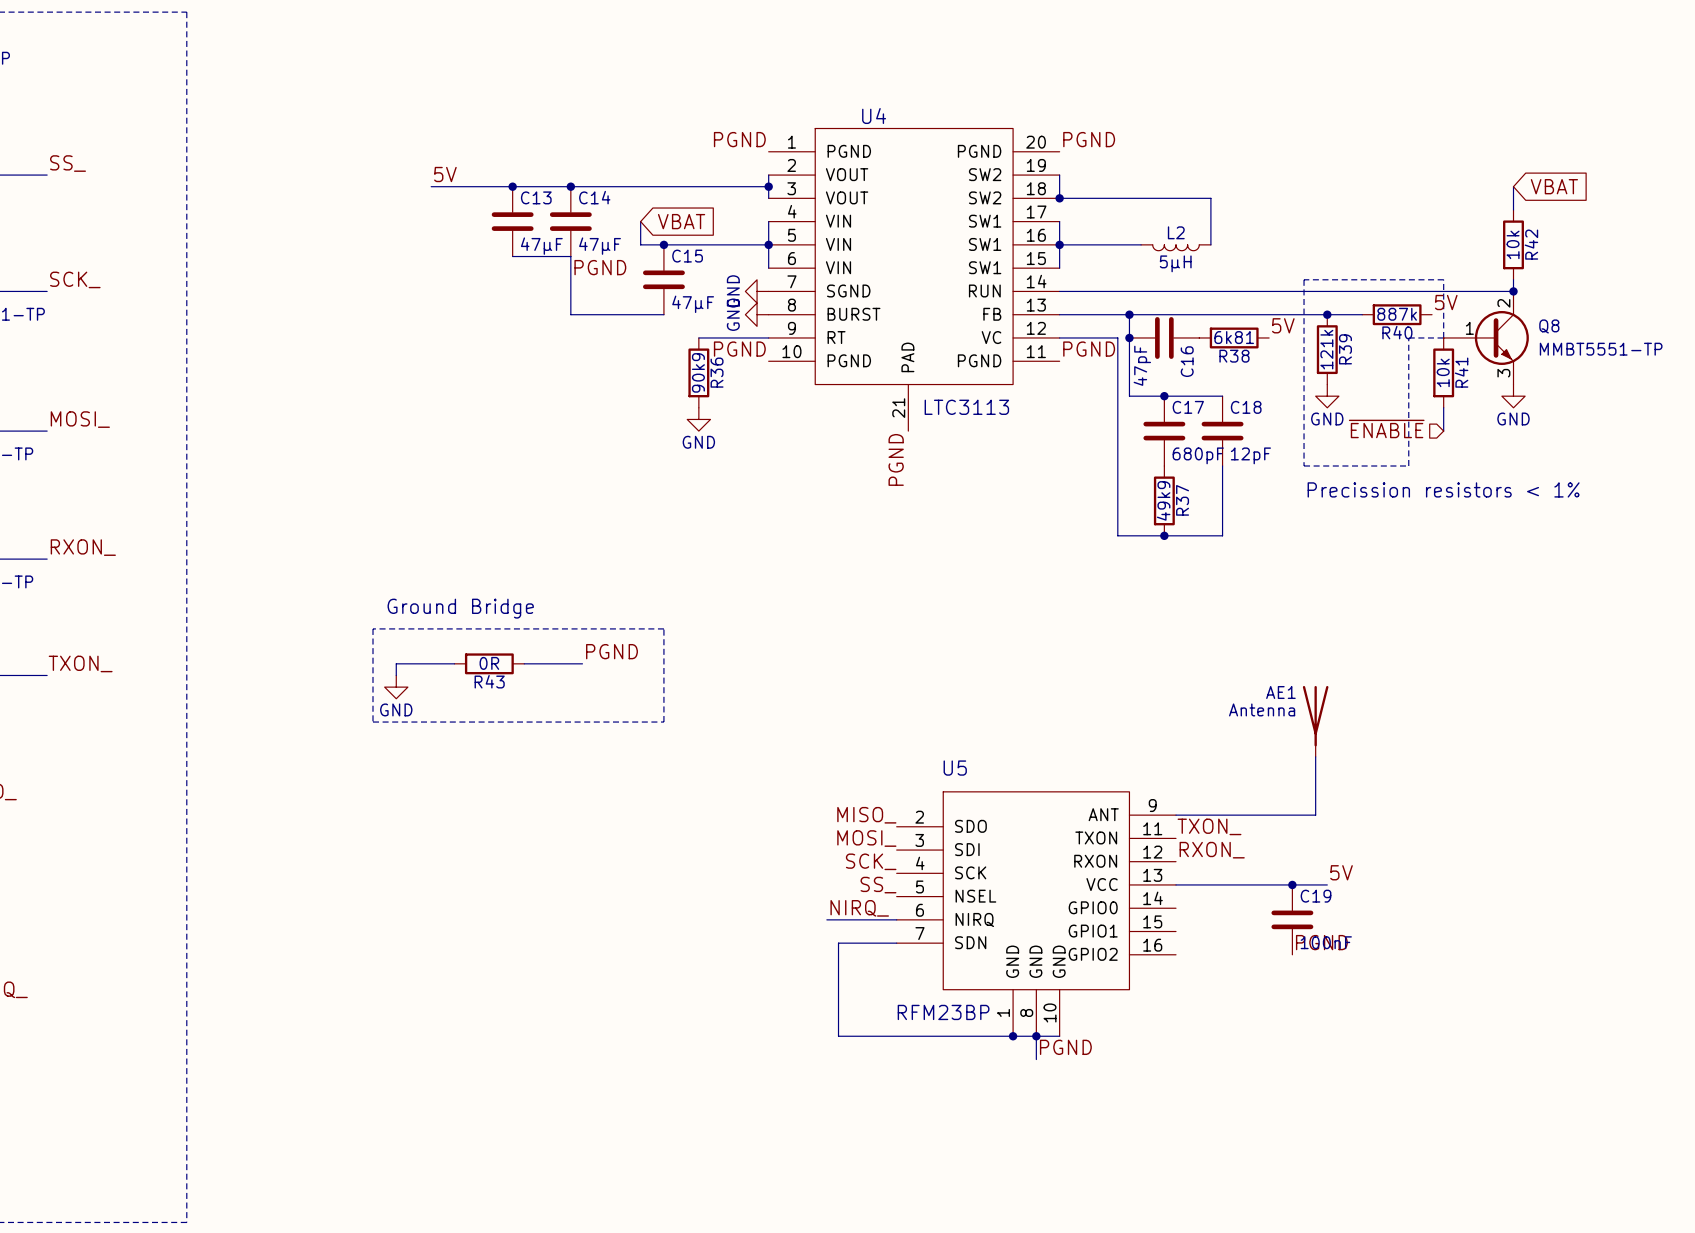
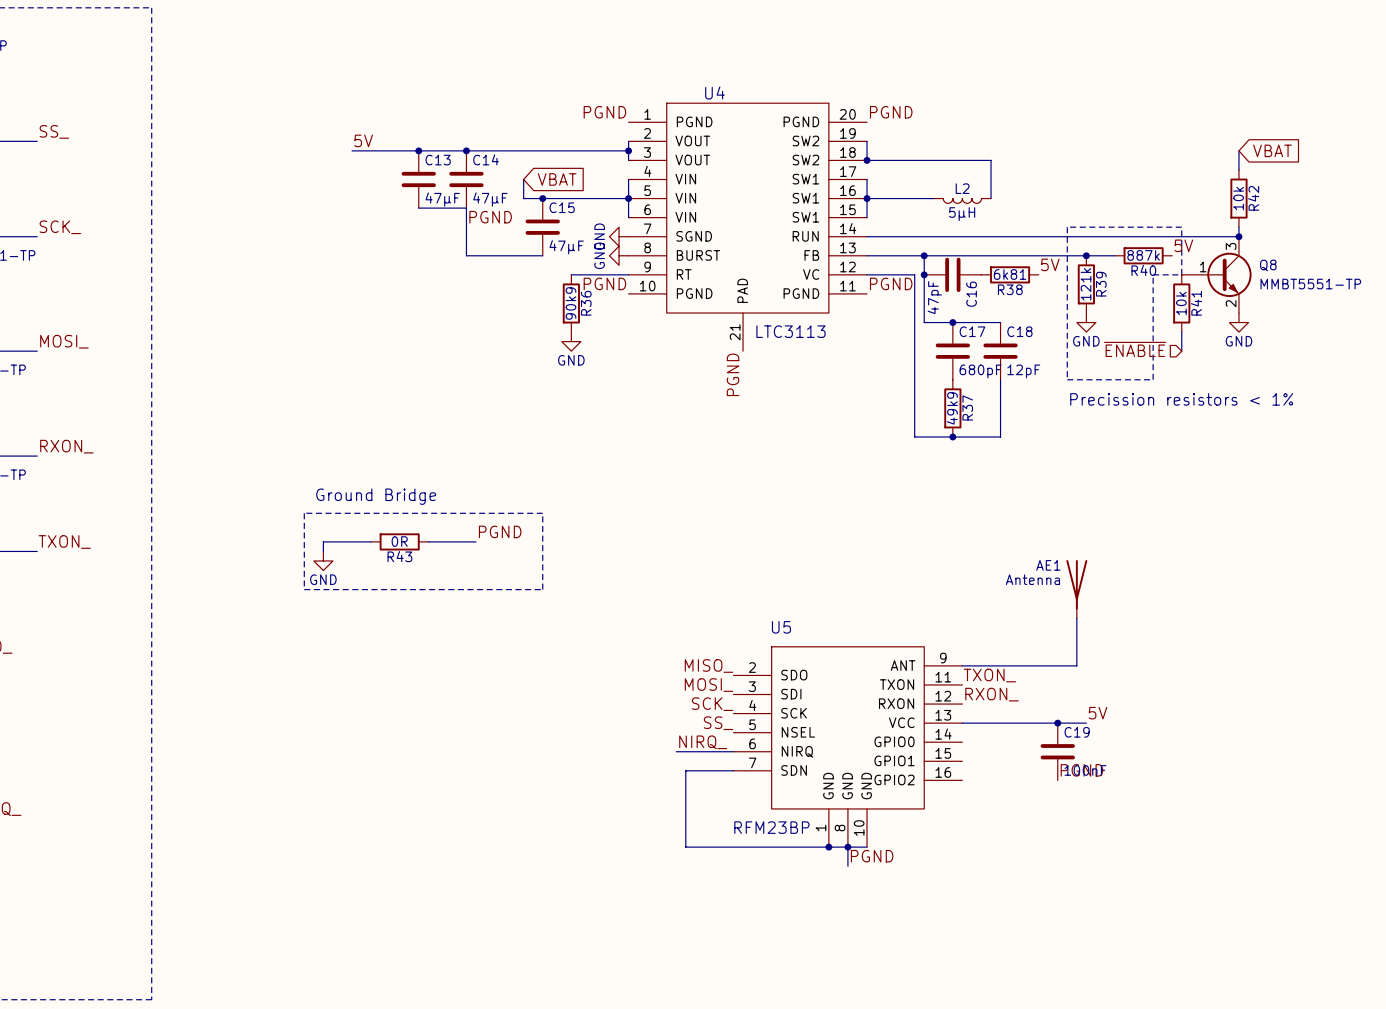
Q8 pin number: 2 (1503, 303) -> 3 (1231, 246)
Q8 pin number: 3 (1503, 373) -> 2 (1231, 303)

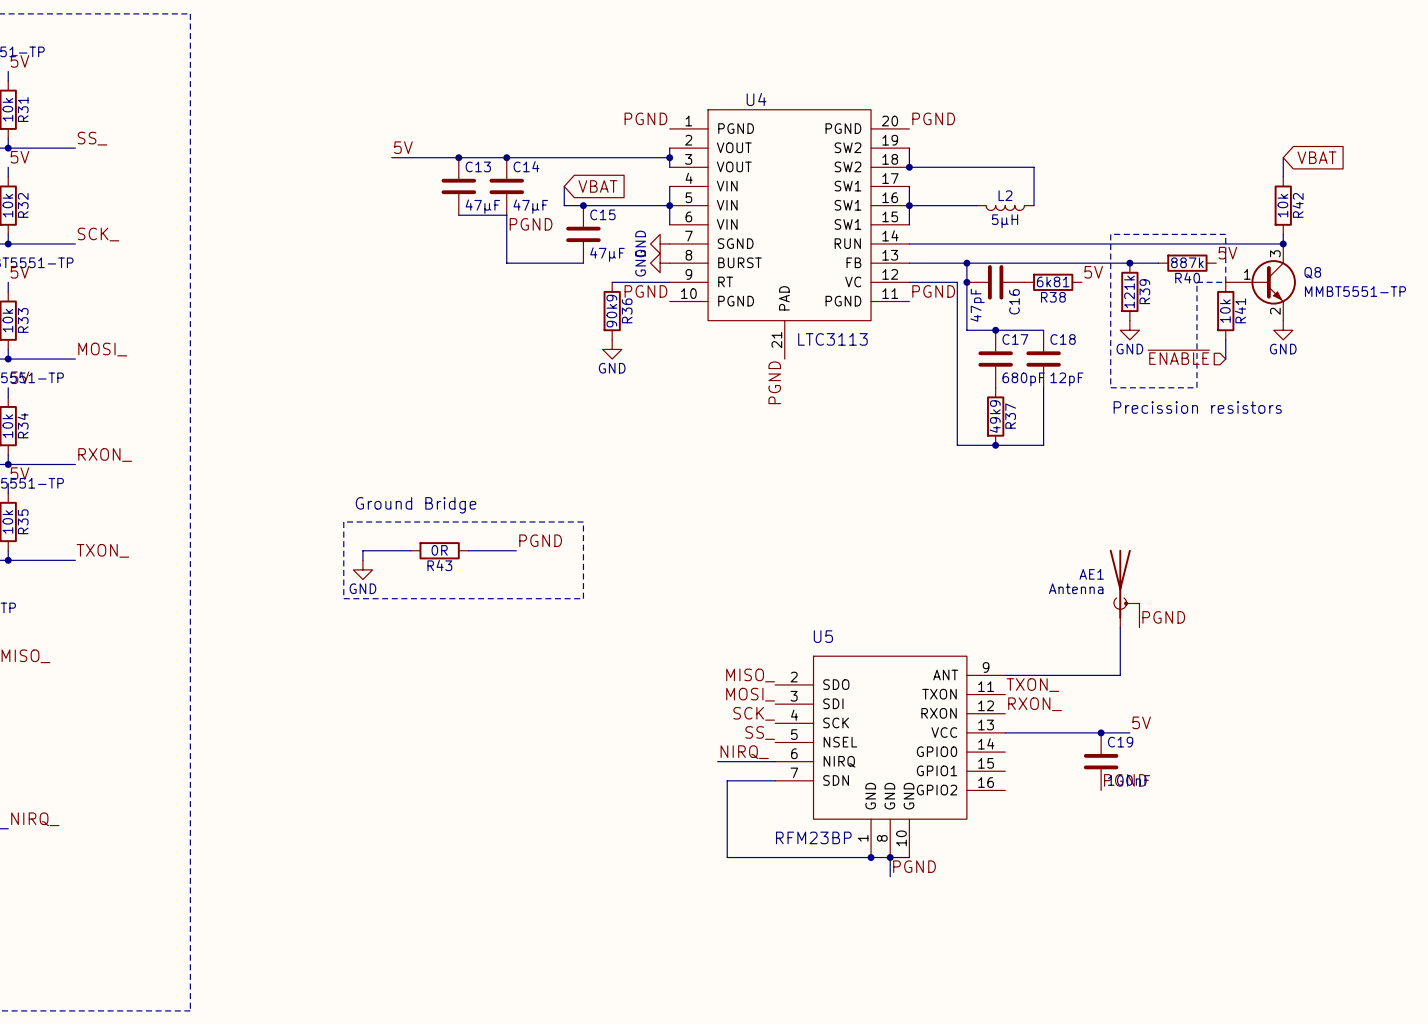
text: Precission resistors < 1% (1181, 399) -> Precission resistors (1197, 407)
AE1 symbol: [1066, 560, 1088, 619] -> [1109, 549, 1140, 628]
label: none -> PGND (1163, 617)

